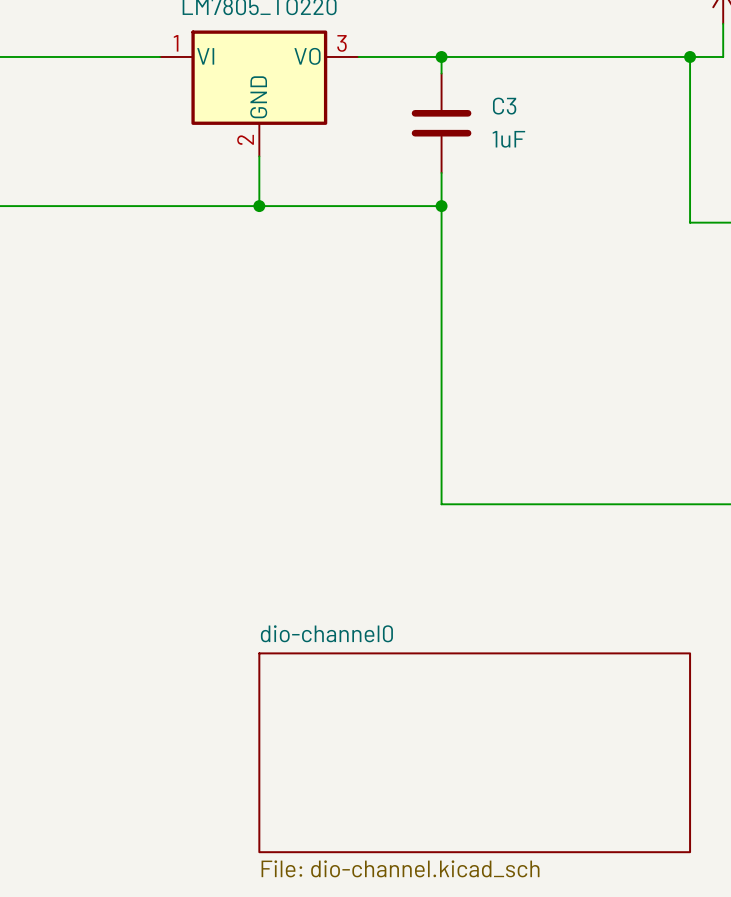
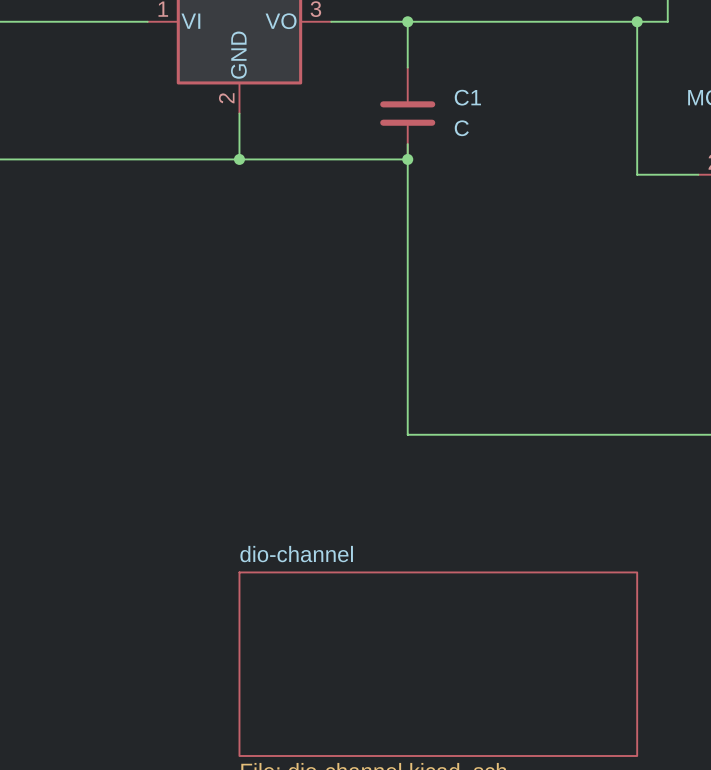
C3: 1uF (441, 123) -> none
C1: none -> C (407, 113)
sheet dio-channel0 name: dio-channel0 (326, 633) -> dio-channel (296, 554)

